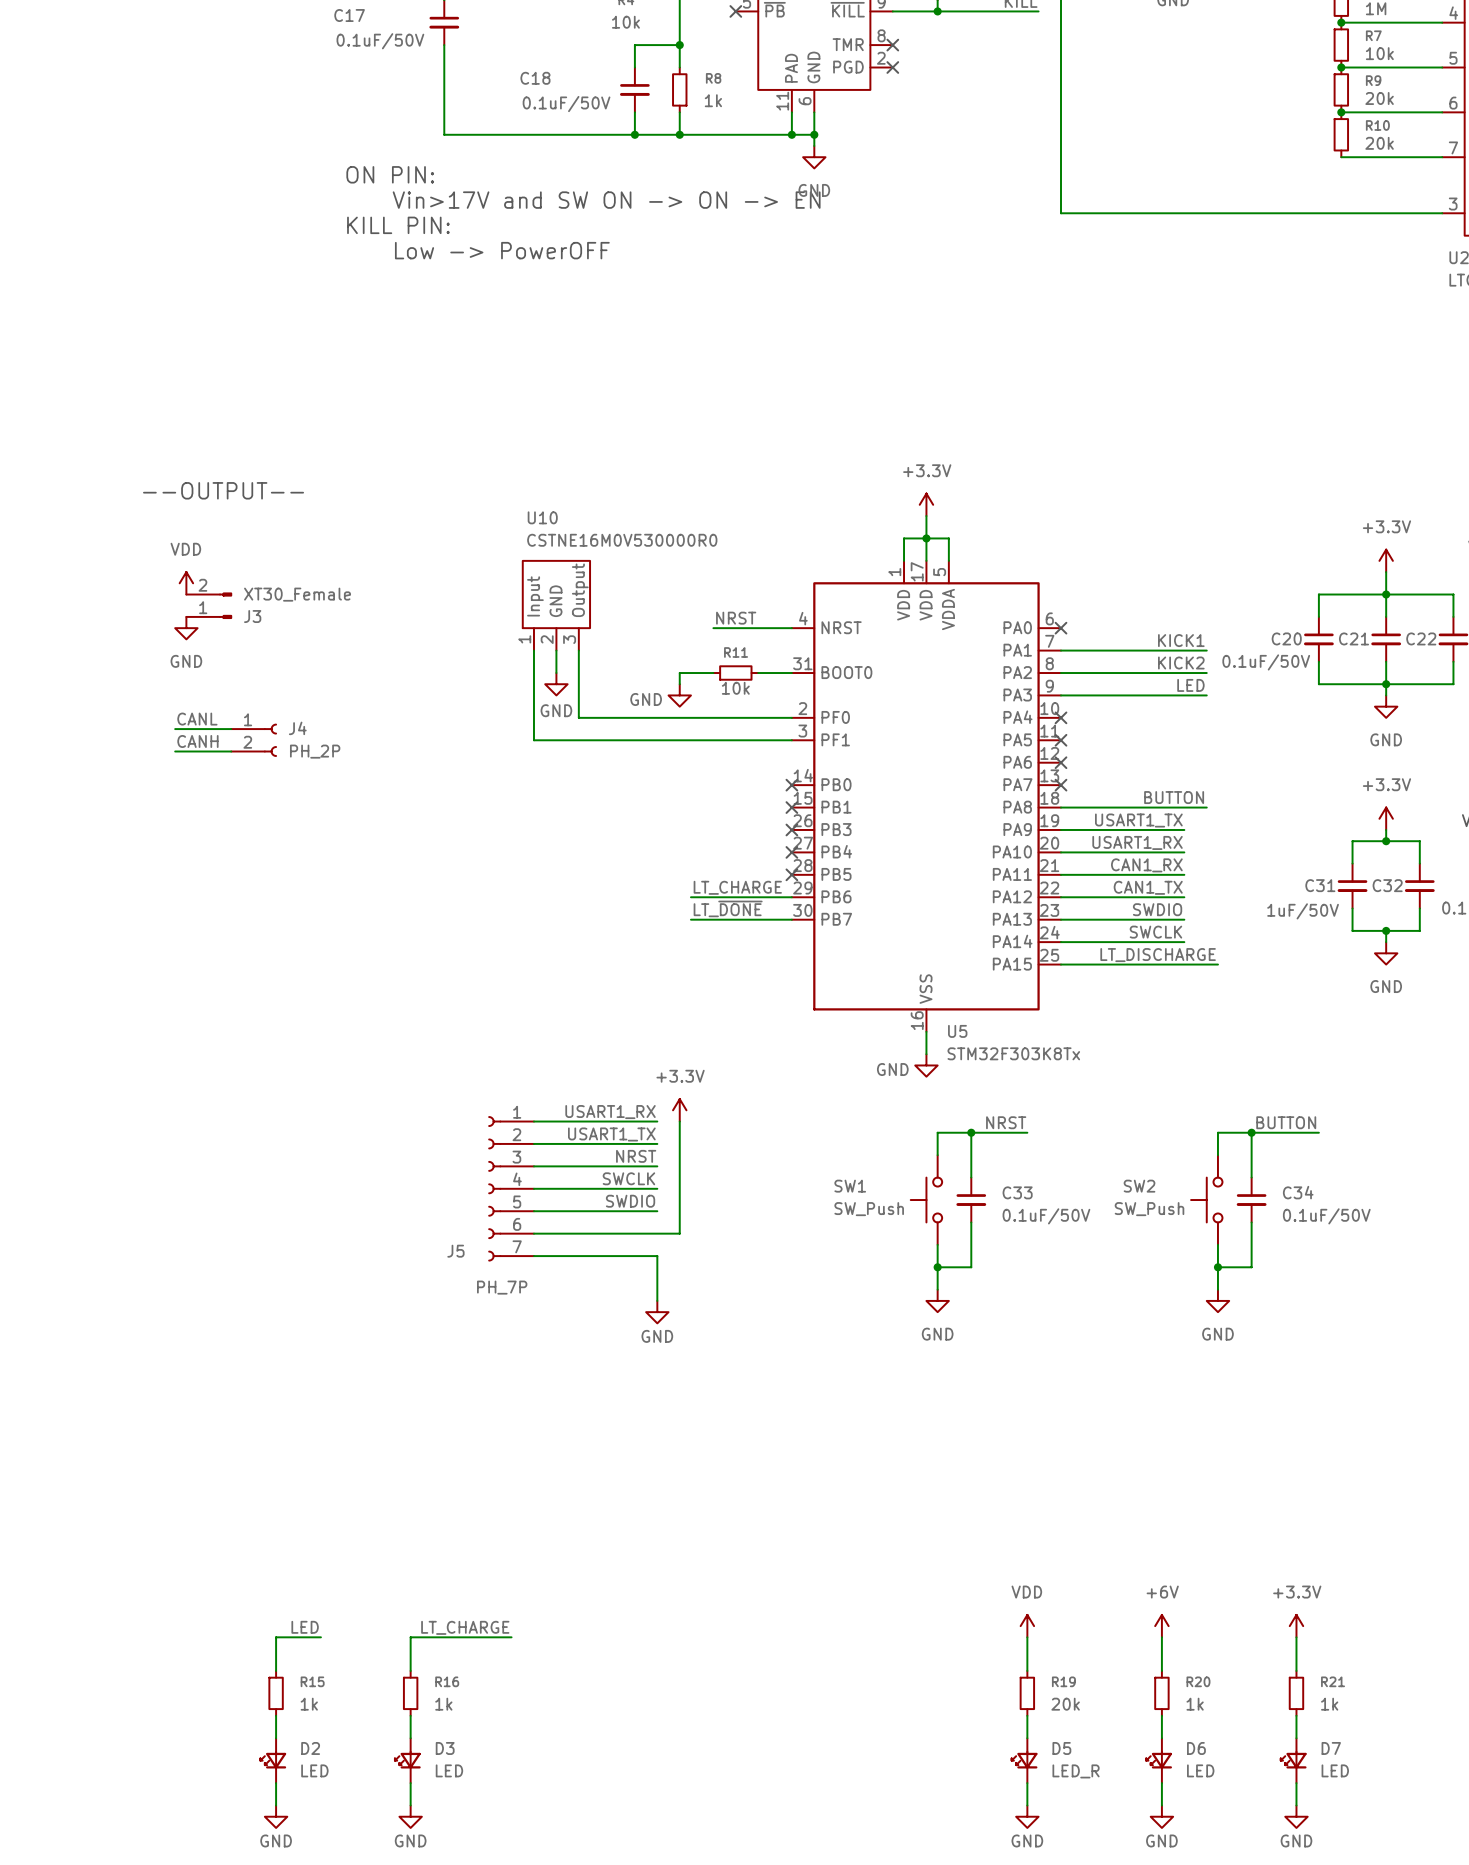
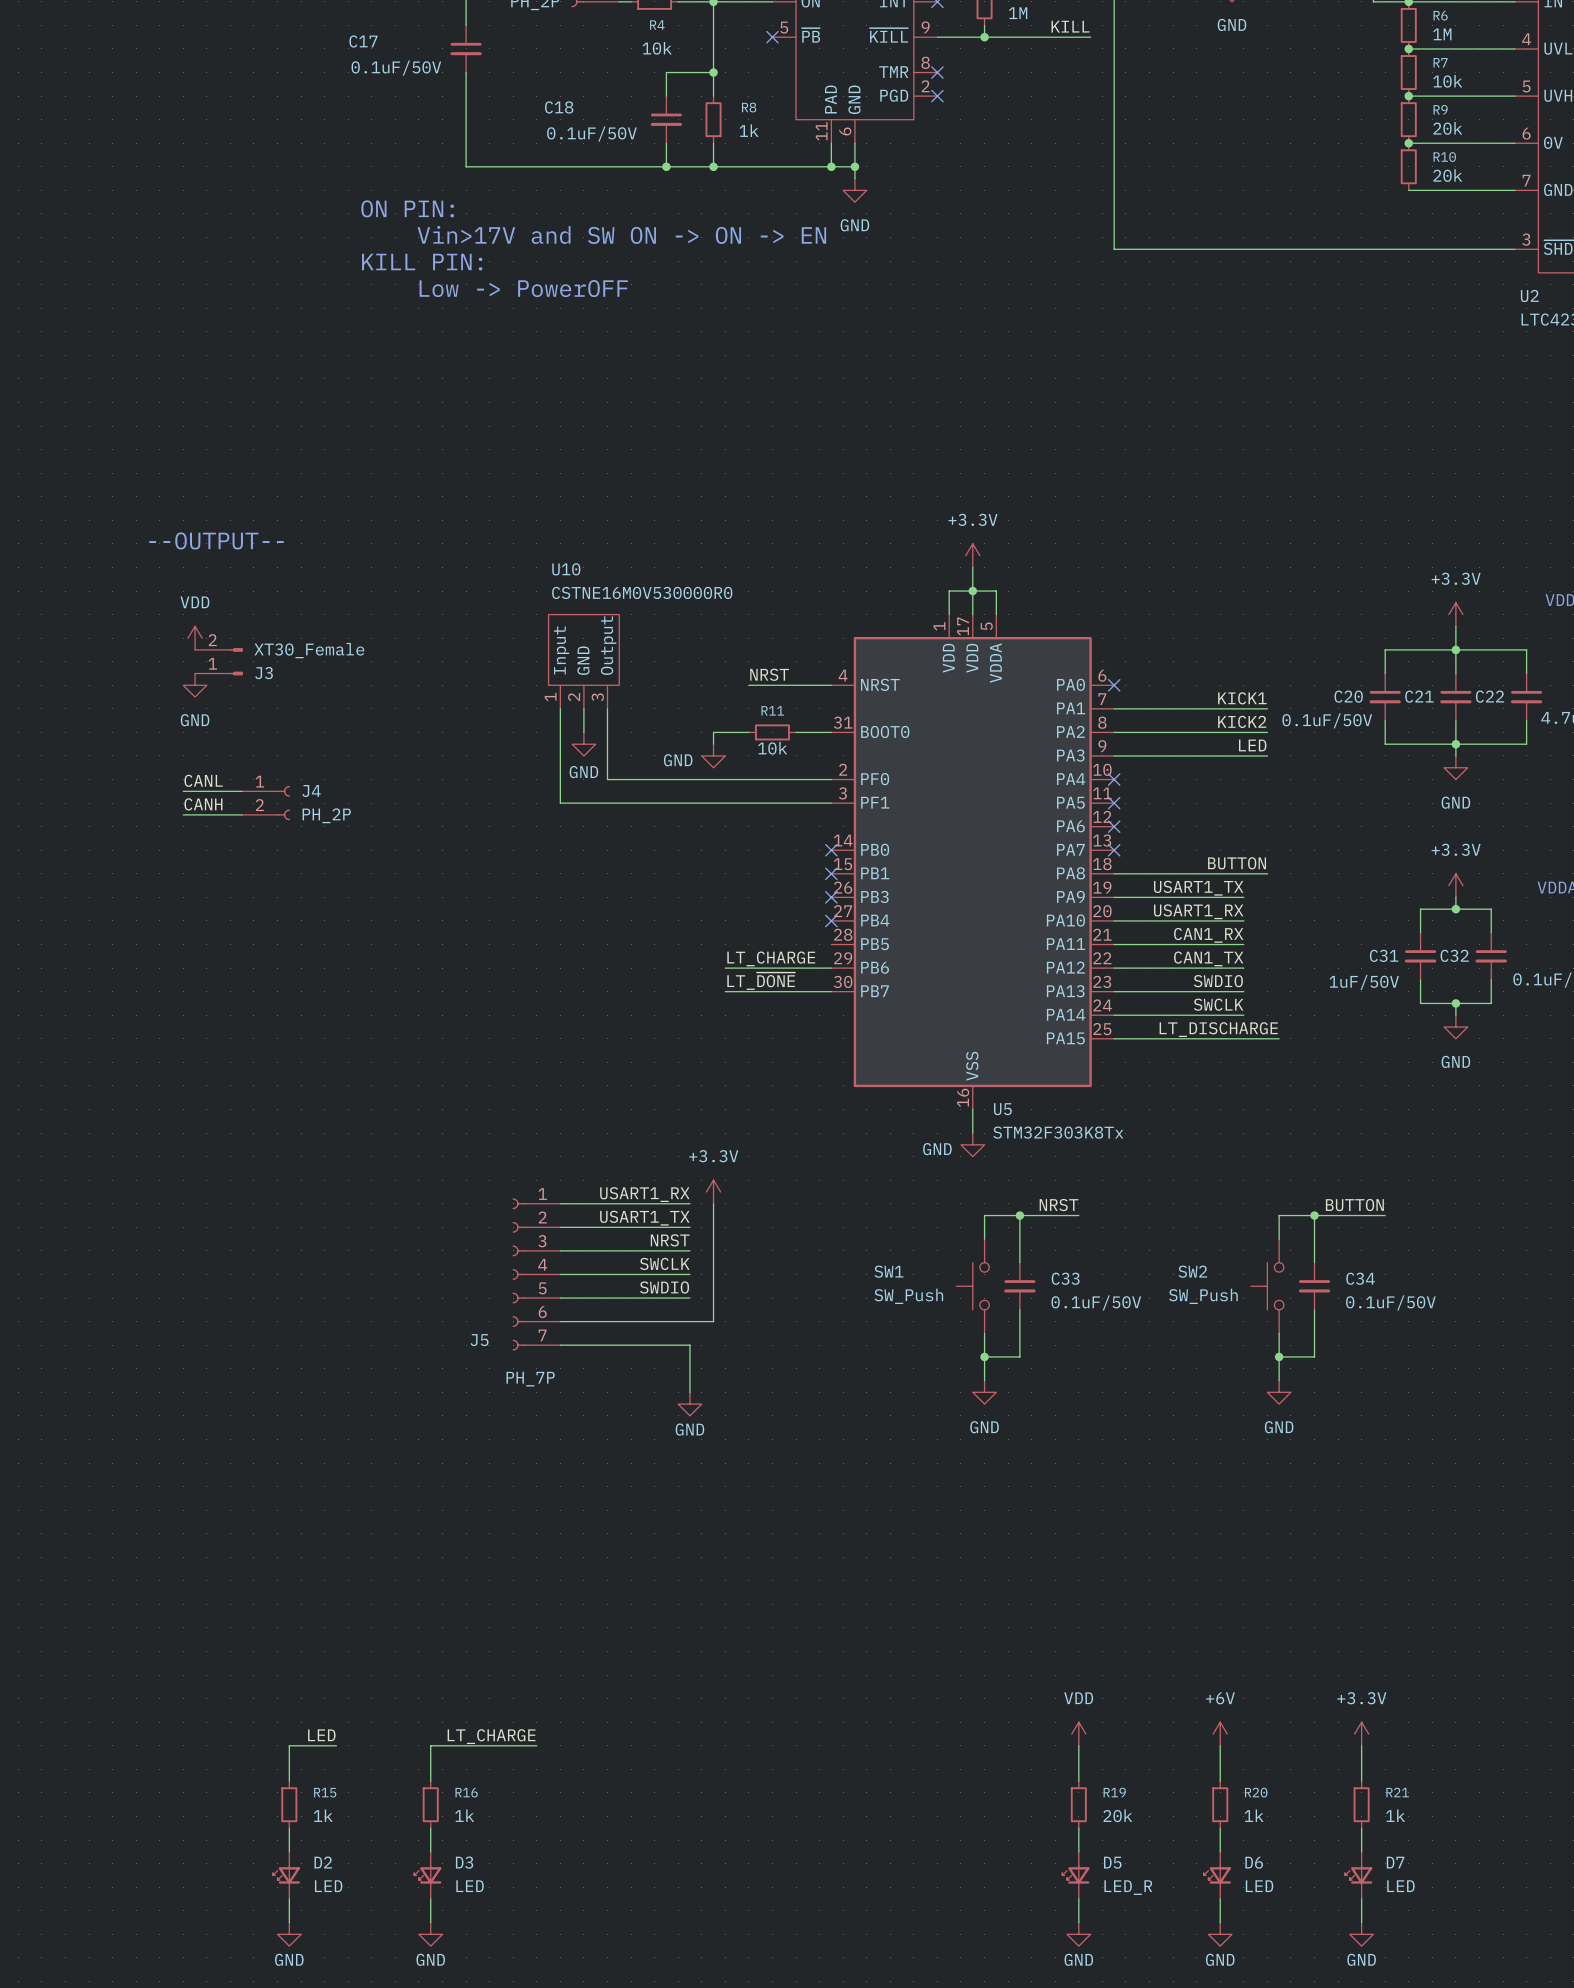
no-connect mark: (791, 874) -> none

